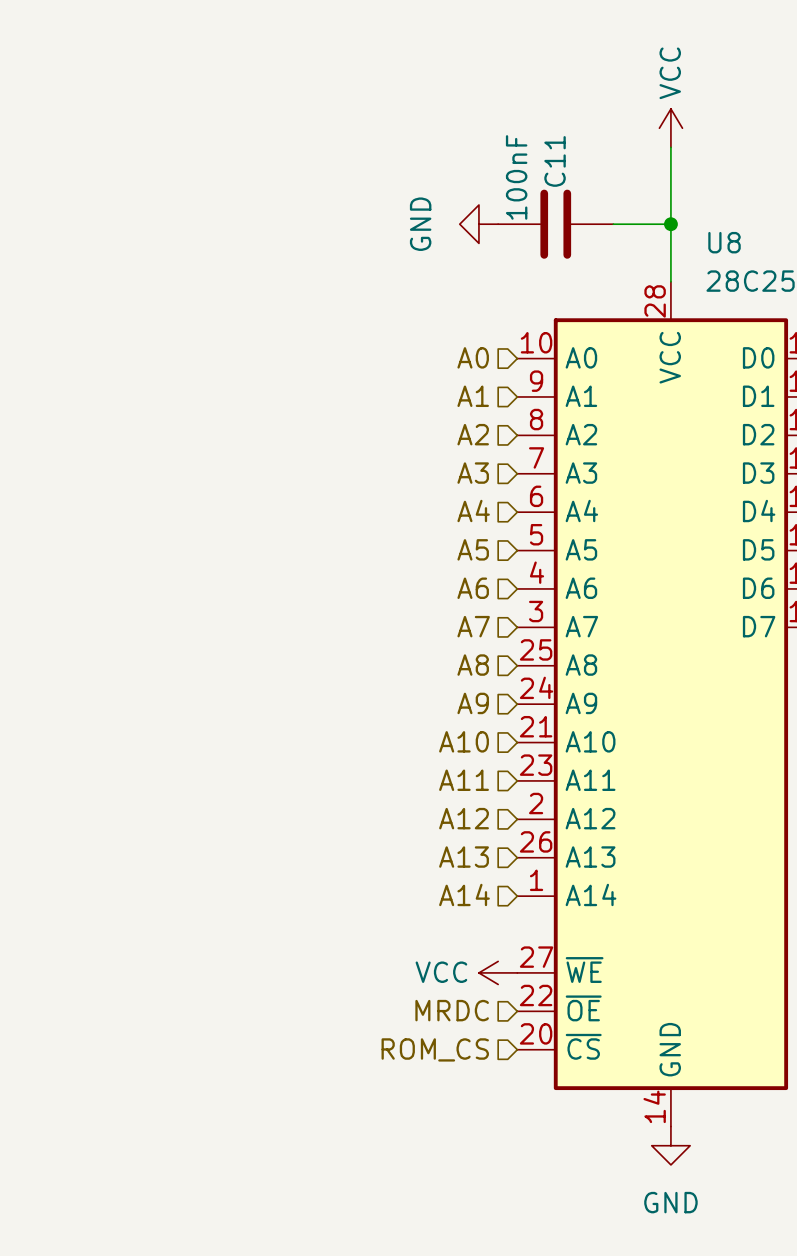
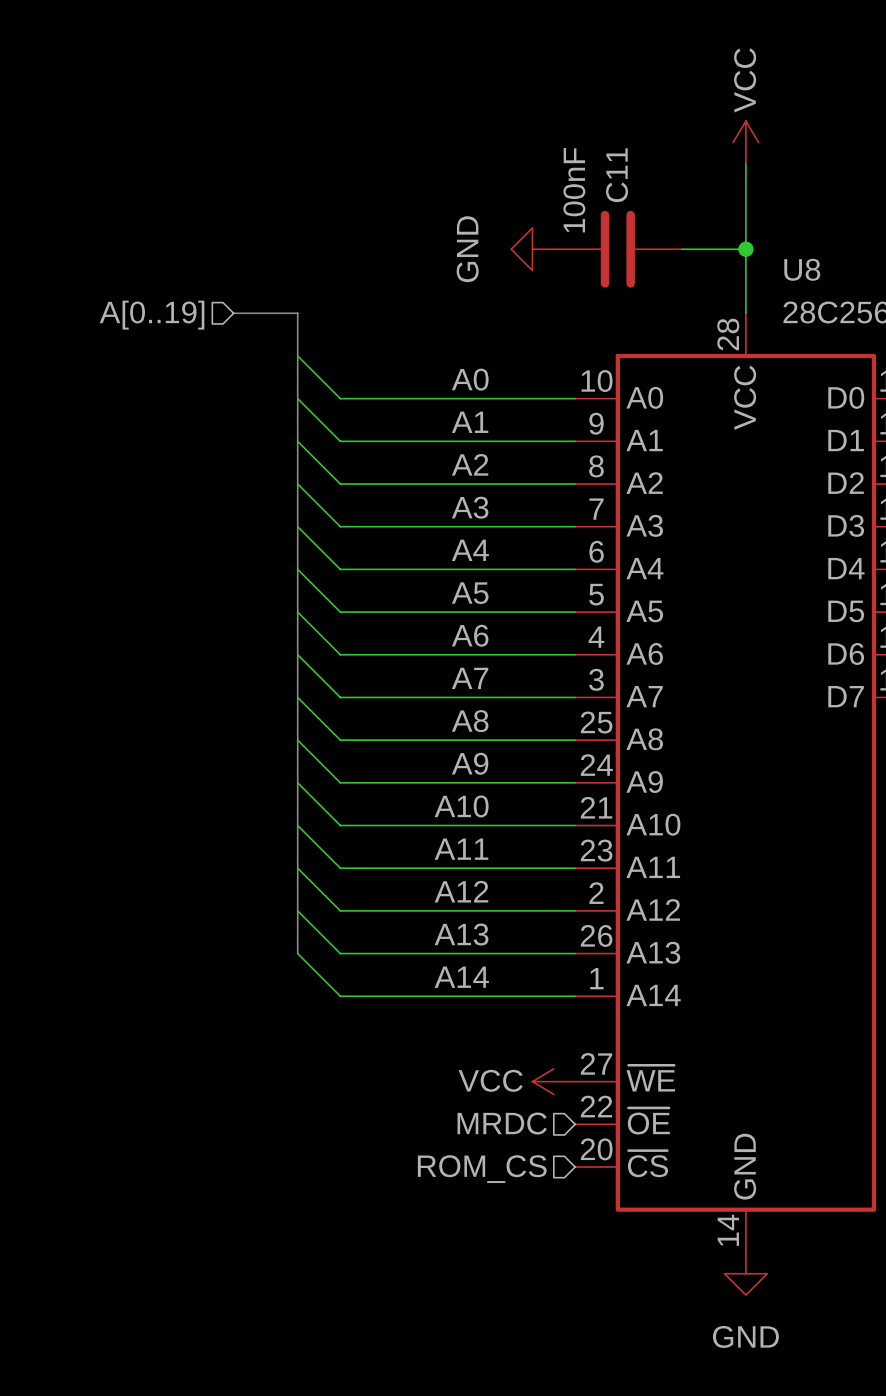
bus: none -> (233, 313) (297, 313) (297, 953)
hierarchical label: none -> A[0..19] (152, 315)
wire: none -> (297, 355) (340, 398) (575, 398)
label: none -> A0 (470, 379)
hierarchical label: A0 (473, 357) -> none
wire: none -> (297, 398) (340, 441) (575, 441)
label: none -> A1 (470, 422)
wire: none -> (297, 441) (340, 484) (575, 484)
hierarchical label: A1 (473, 396) -> none
label: none -> A2 (470, 464)
hierarchical label: A2 (473, 434) -> none
wire: none -> (297, 484) (340, 526) (575, 526)
label: none -> A3 (470, 507)
wire: none -> (297, 526) (340, 569) (575, 569)
hierarchical label: A3 (473, 473) -> none
label: none -> A4 (470, 550)
hierarchical label: A4 (473, 511) -> none
wire: none -> (297, 569) (340, 612) (575, 612)
label: none -> A5 (470, 593)
hierarchical label: A5 (473, 549) -> none
wire: none -> (297, 612) (340, 654) (575, 654)
label: none -> A6 (470, 635)
wire: none -> (297, 654) (340, 697) (575, 697)
hierarchical label: A6 (473, 588) -> none
label: none -> A7 (470, 678)
hierarchical label: A7 (473, 626) -> none
wire: none -> (297, 697) (340, 740) (575, 740)
label: none -> A8 (470, 721)
wire: none -> (297, 740) (340, 782) (575, 782)
hierarchical label: A8 (473, 665) -> none
label: none -> A9 (470, 763)
hierarchical label: A9 (473, 703) -> none
wire: none -> (297, 782) (340, 825) (575, 825)
label: none -> A10 (461, 806)
hierarchical label: A10 (464, 741) -> none
wire: none -> (297, 825) (340, 868) (575, 868)
label: none -> A11 (461, 849)
wire: none -> (297, 868) (340, 910) (575, 910)
hierarchical label: A11 (464, 780) -> none
label: none -> A12 (461, 891)
hierarchical label: A12 (464, 818) -> none
wire: none -> (297, 910) (340, 953) (575, 953)
label: none -> A13 (461, 934)
wire: none -> (297, 953) (340, 996) (575, 996)
hierarchical label: A13 (464, 857) -> none
label: none -> A14 (461, 977)
hierarchical label: A14 (464, 894) -> none

